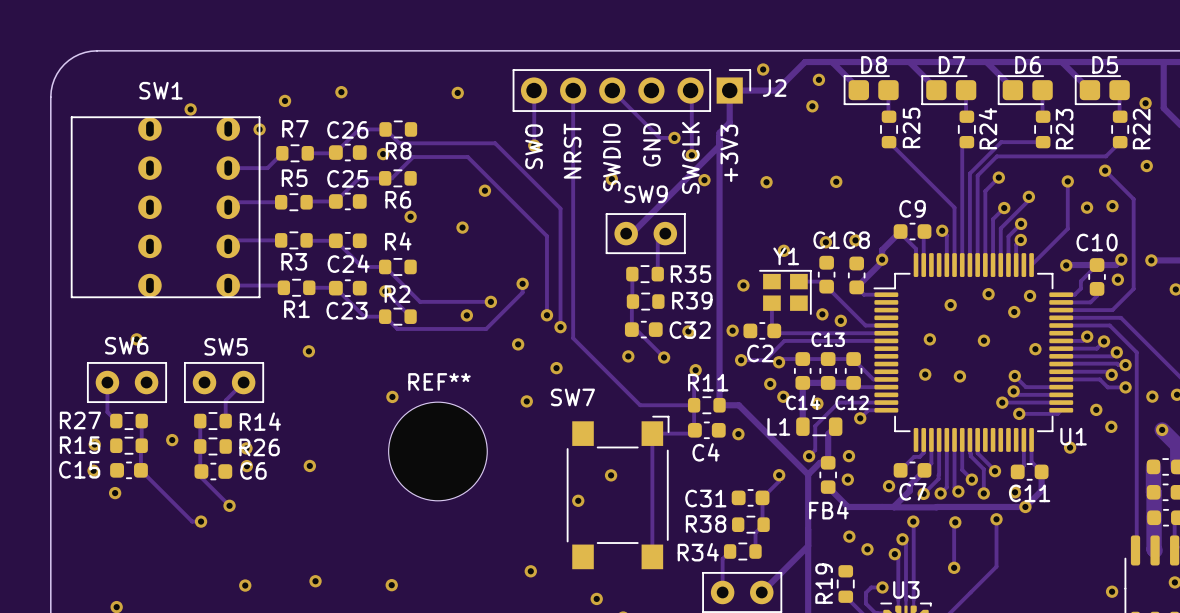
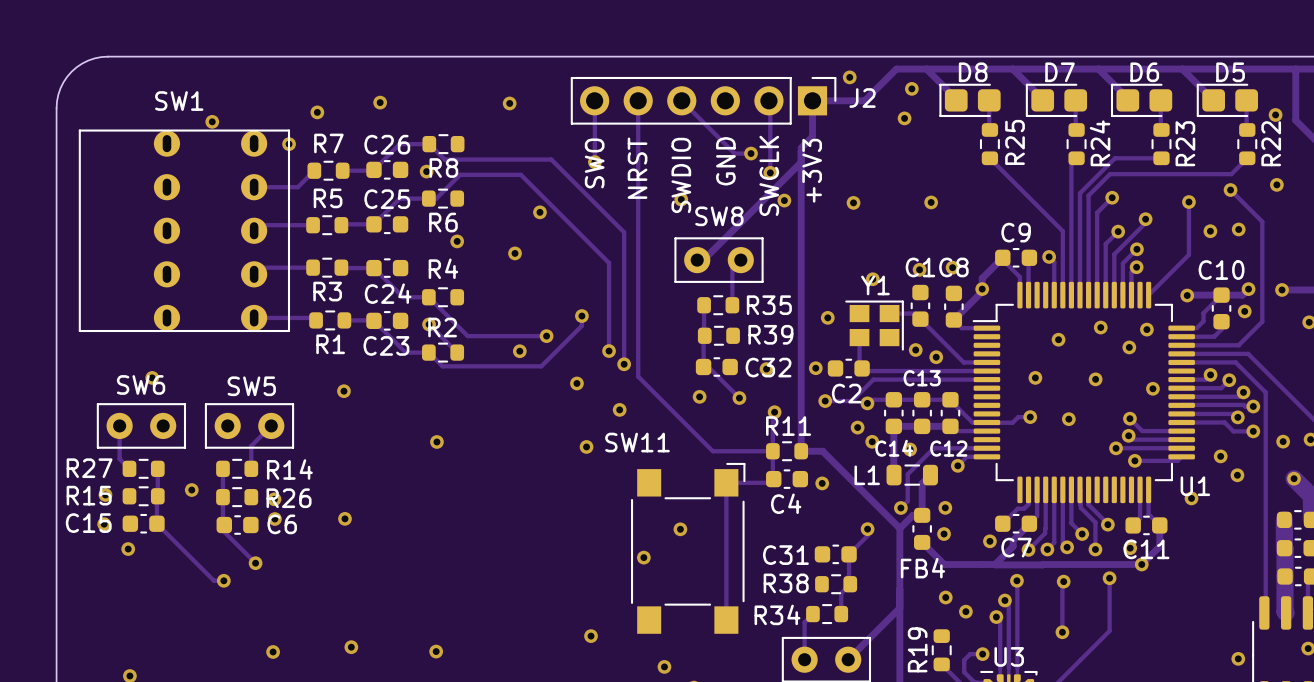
SW9 name: SW9 (646, 194) -> SW8 (719, 216)
track: none -> (1030, 417) (1018, 417) (1012, 422) (986, 422)
SW7 name: SW7 (572, 397) -> SW11 (637, 442)
REF**: (437, 451) -> none

